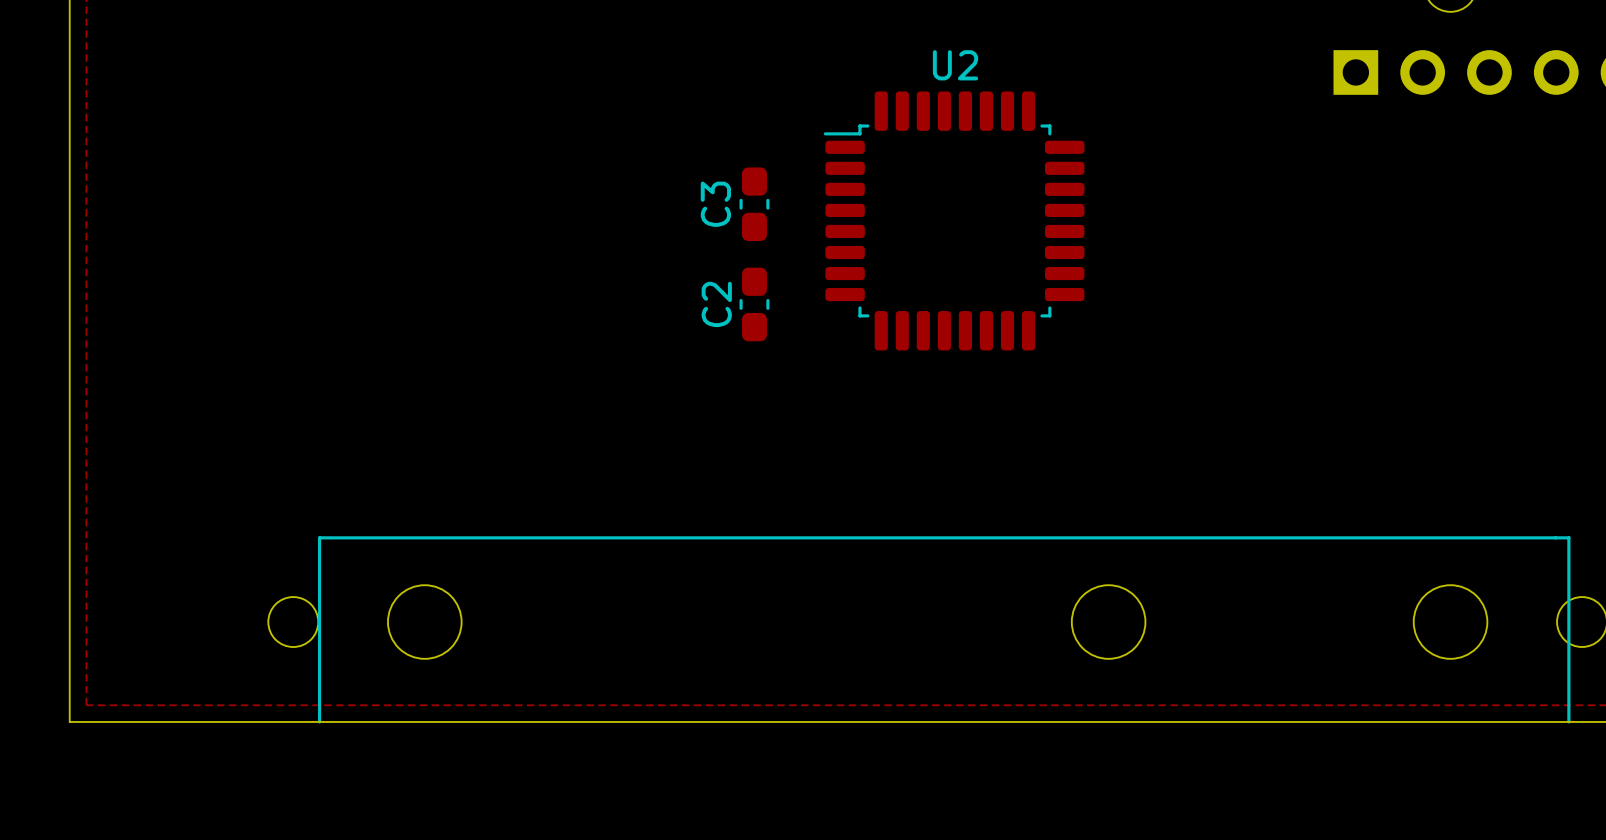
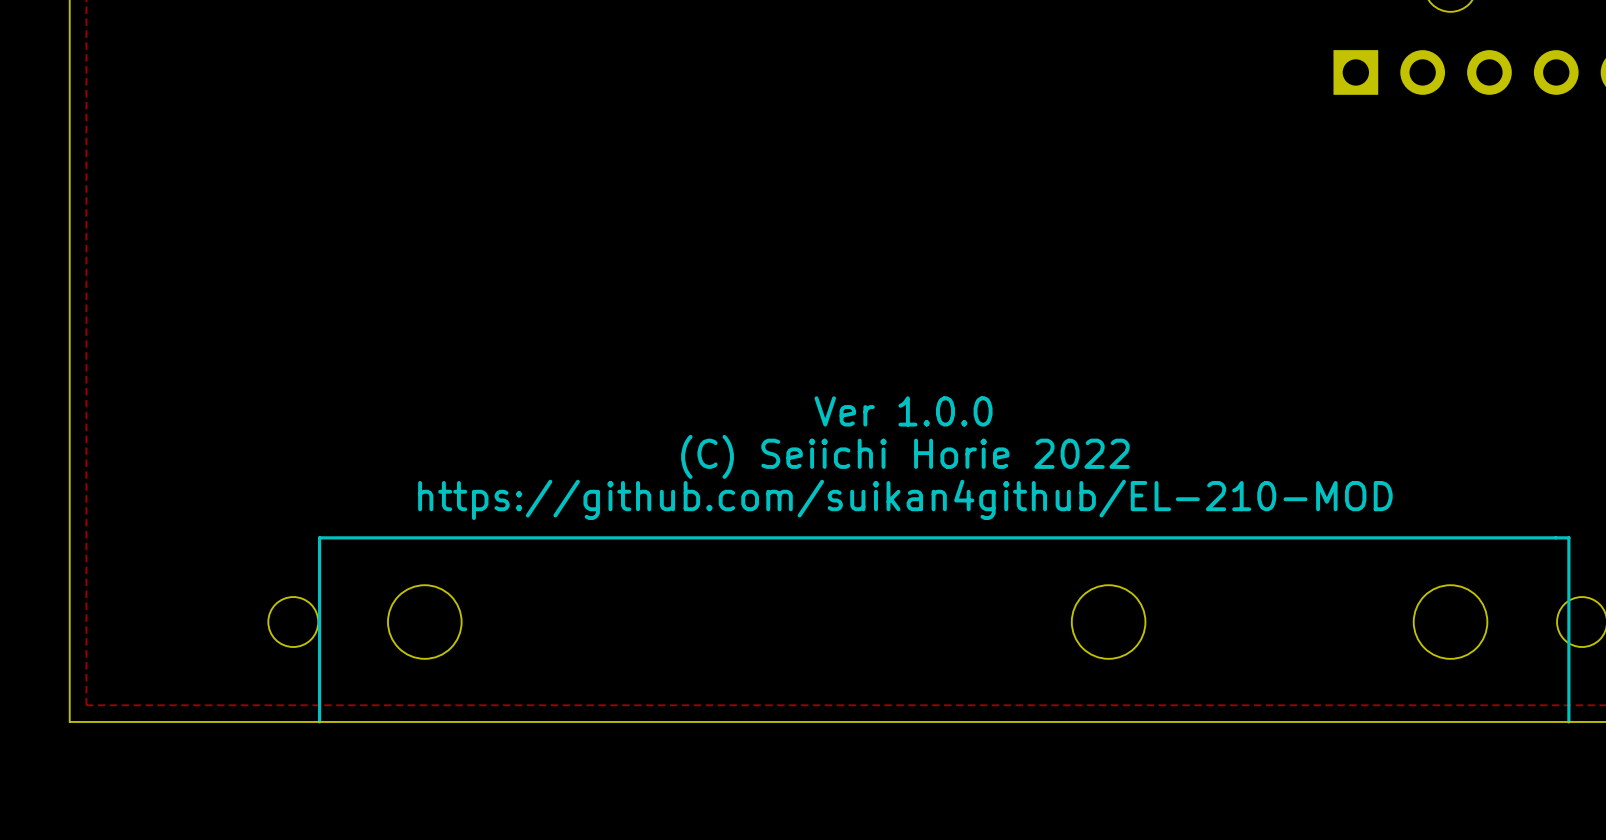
C3: (754, 204) -> none
U2: (954, 220) -> none
C2: (754, 304) -> none
text: none -> Ver 1.0.0 (903, 411)
text: none -> (C) Seiichi Horie 2022 (905, 456)
text: none -> https://github.com/suikan4github/EL-210-MOD (905, 499)

